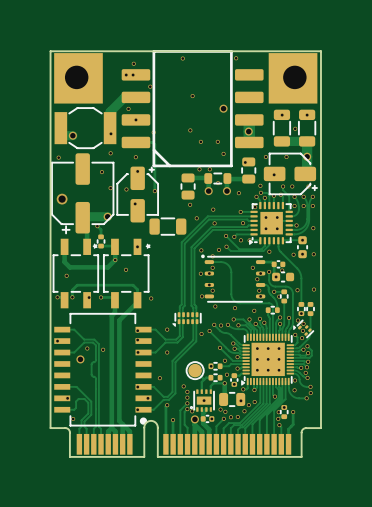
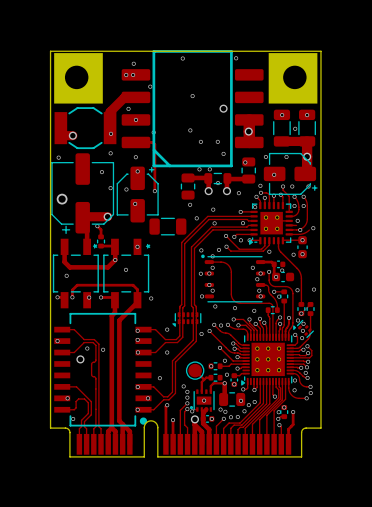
track: (312, 196) (309, 204) (308, 225) (303, 231) (294, 234) -> (309, 230) (302, 233) (294, 234)
via: (312, 196) -> none
via: (312, 206) -> none
via: none -> (297, 220)
via: (296, 225) -> none
via: none -> (300, 230)
via: (313, 254) -> none

